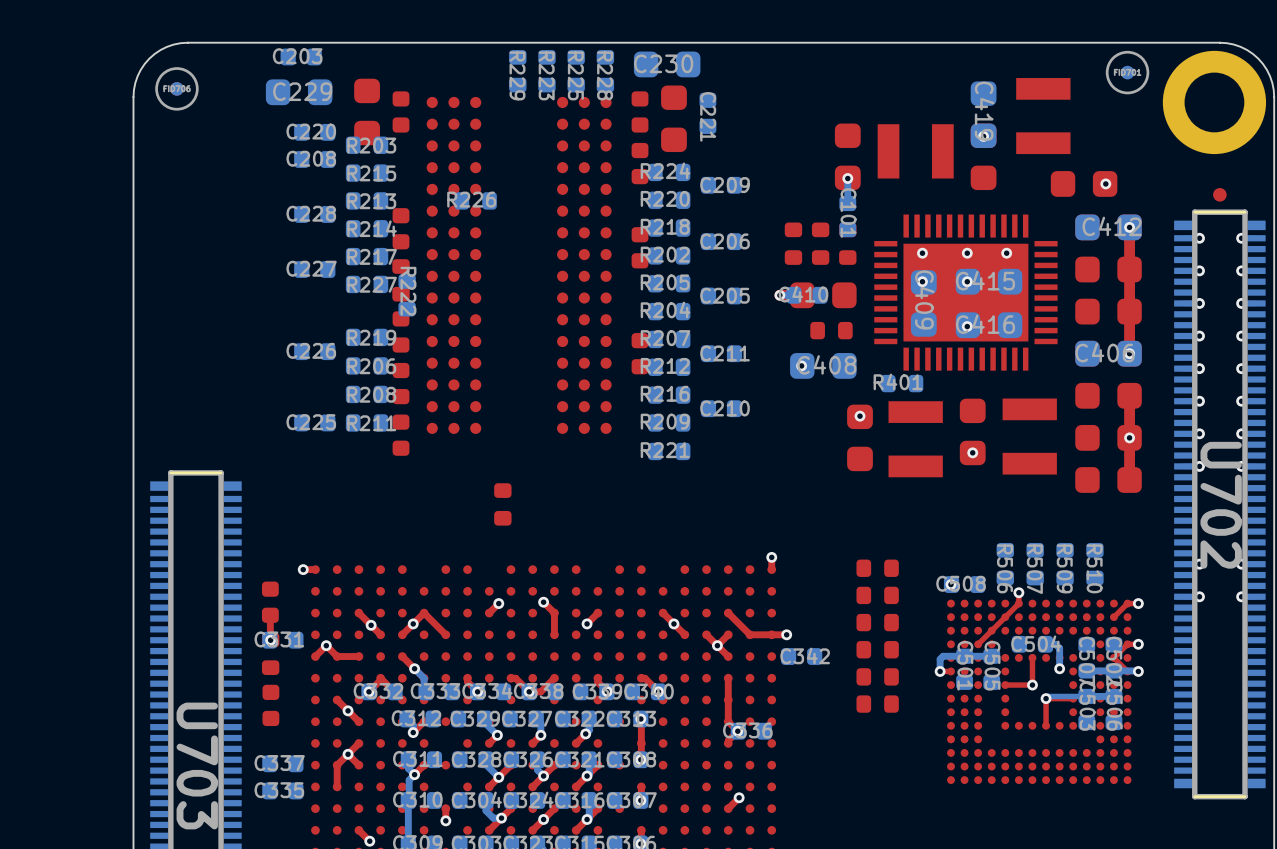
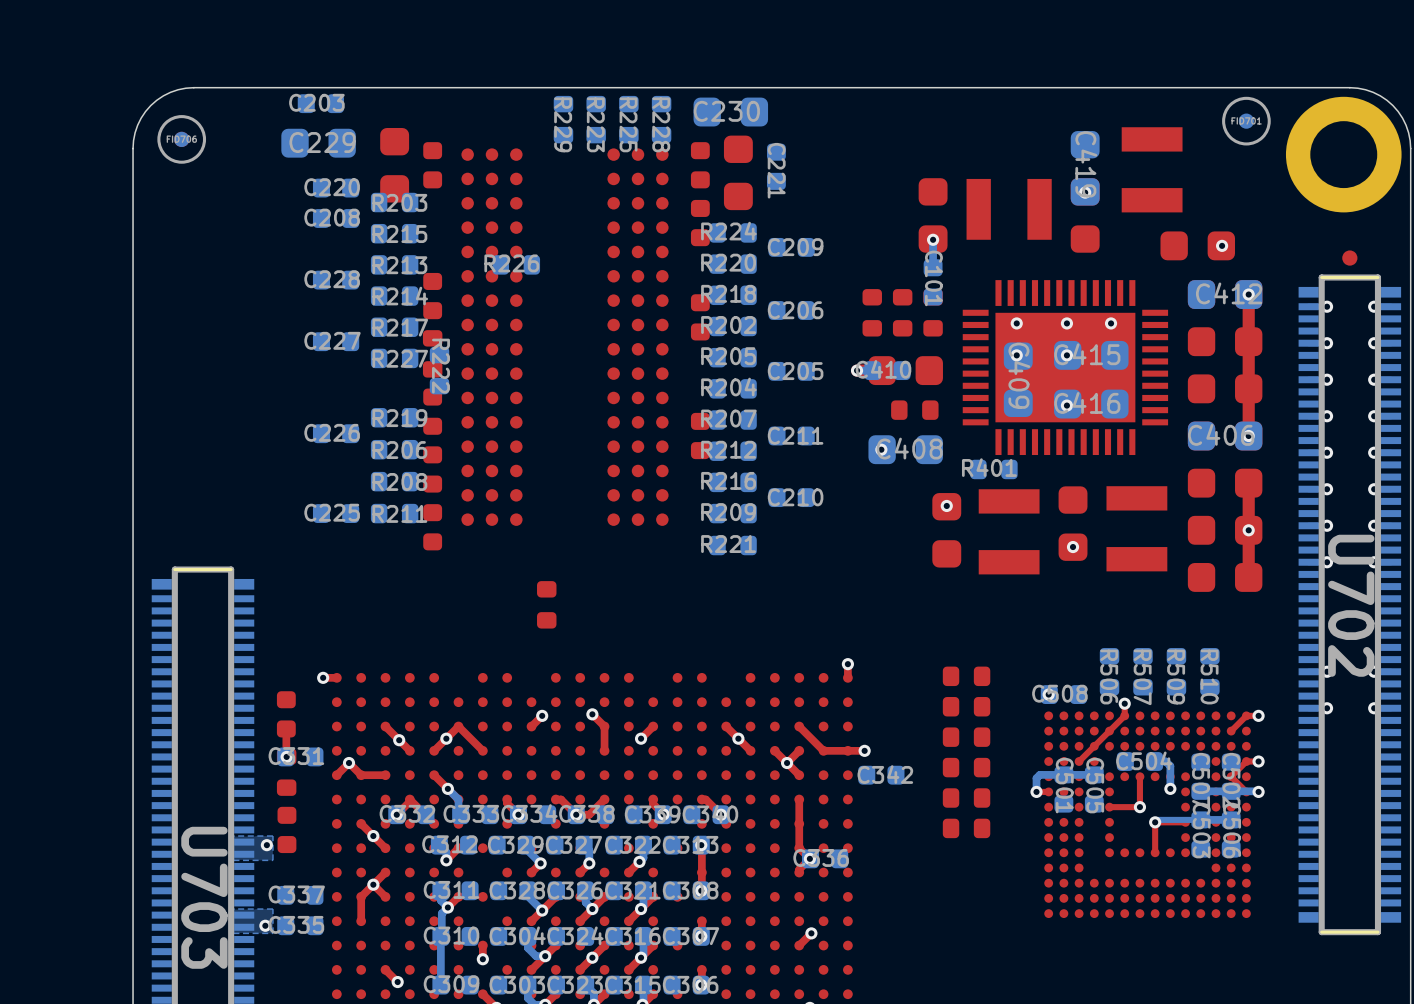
bottom zone outline: none -> (272, 836) (272, 860) (233, 860) (233, 836) (272, 836)
via: none -> (266, 845)
bottom zone outline: none -> (272, 909) (272, 933) (233, 933) (233, 909) (272, 909)
via: none -> (265, 925)

